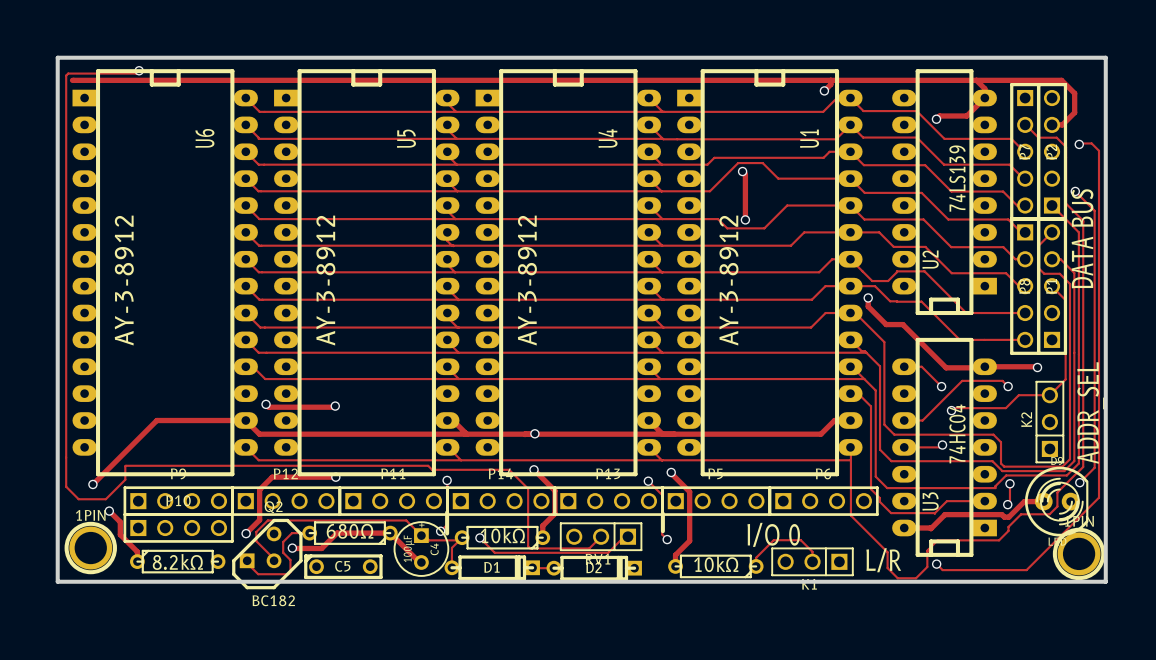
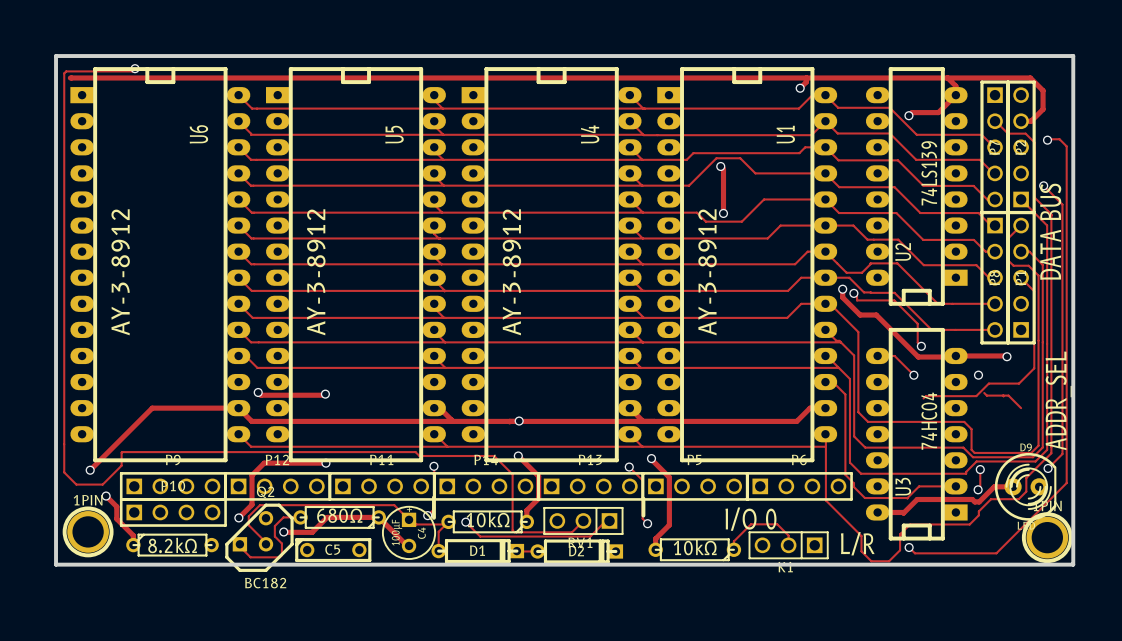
track: none -> (853, 293) (857, 296) (857, 300) (894, 300) (917, 323) (917, 342) (921, 346)
via: none -> (853, 293)
via: none -> (921, 346)
track: (1008, 386) (1002, 380) (962, 380) (922, 420) (904, 420) -> none
track: none -> (984, 393) (986, 395) (1008, 395) (1021, 408)
via: (951, 410) -> none
K2: (1049, 422) -> none
track: (942, 445) (940, 447) (904, 447) -> none
via: (942, 445) -> none

